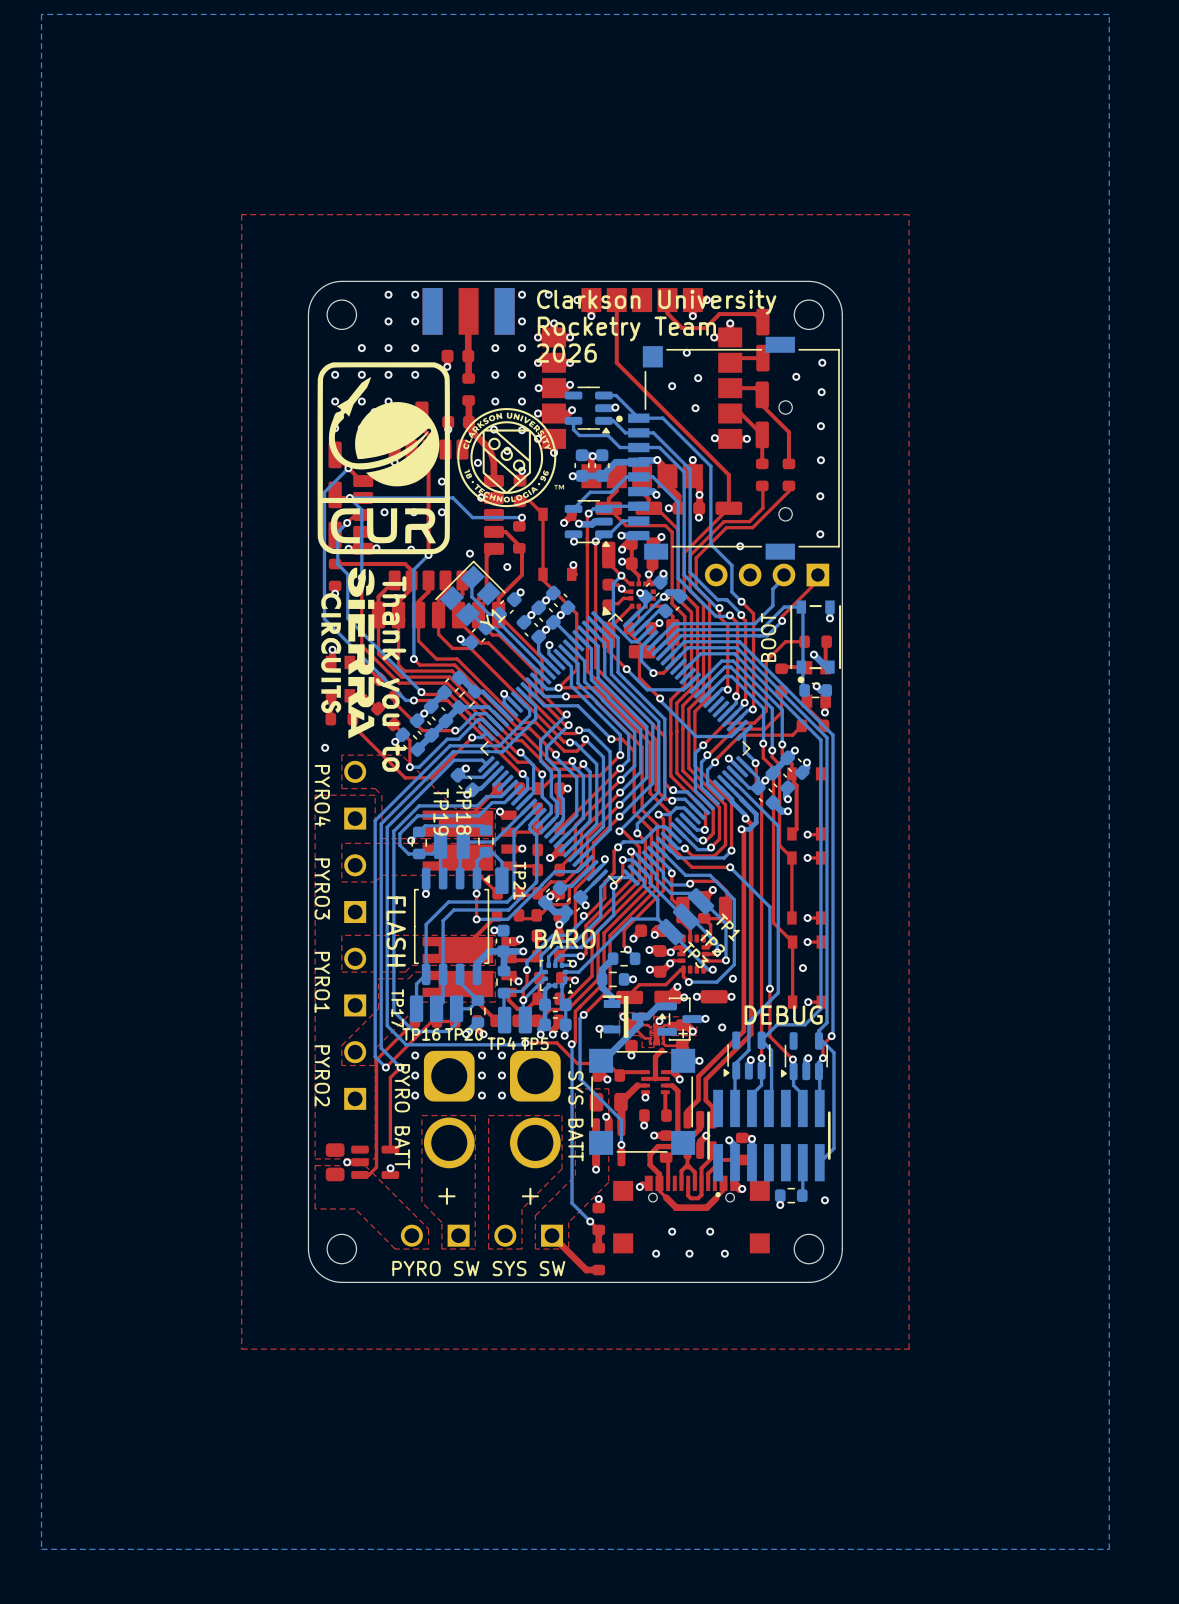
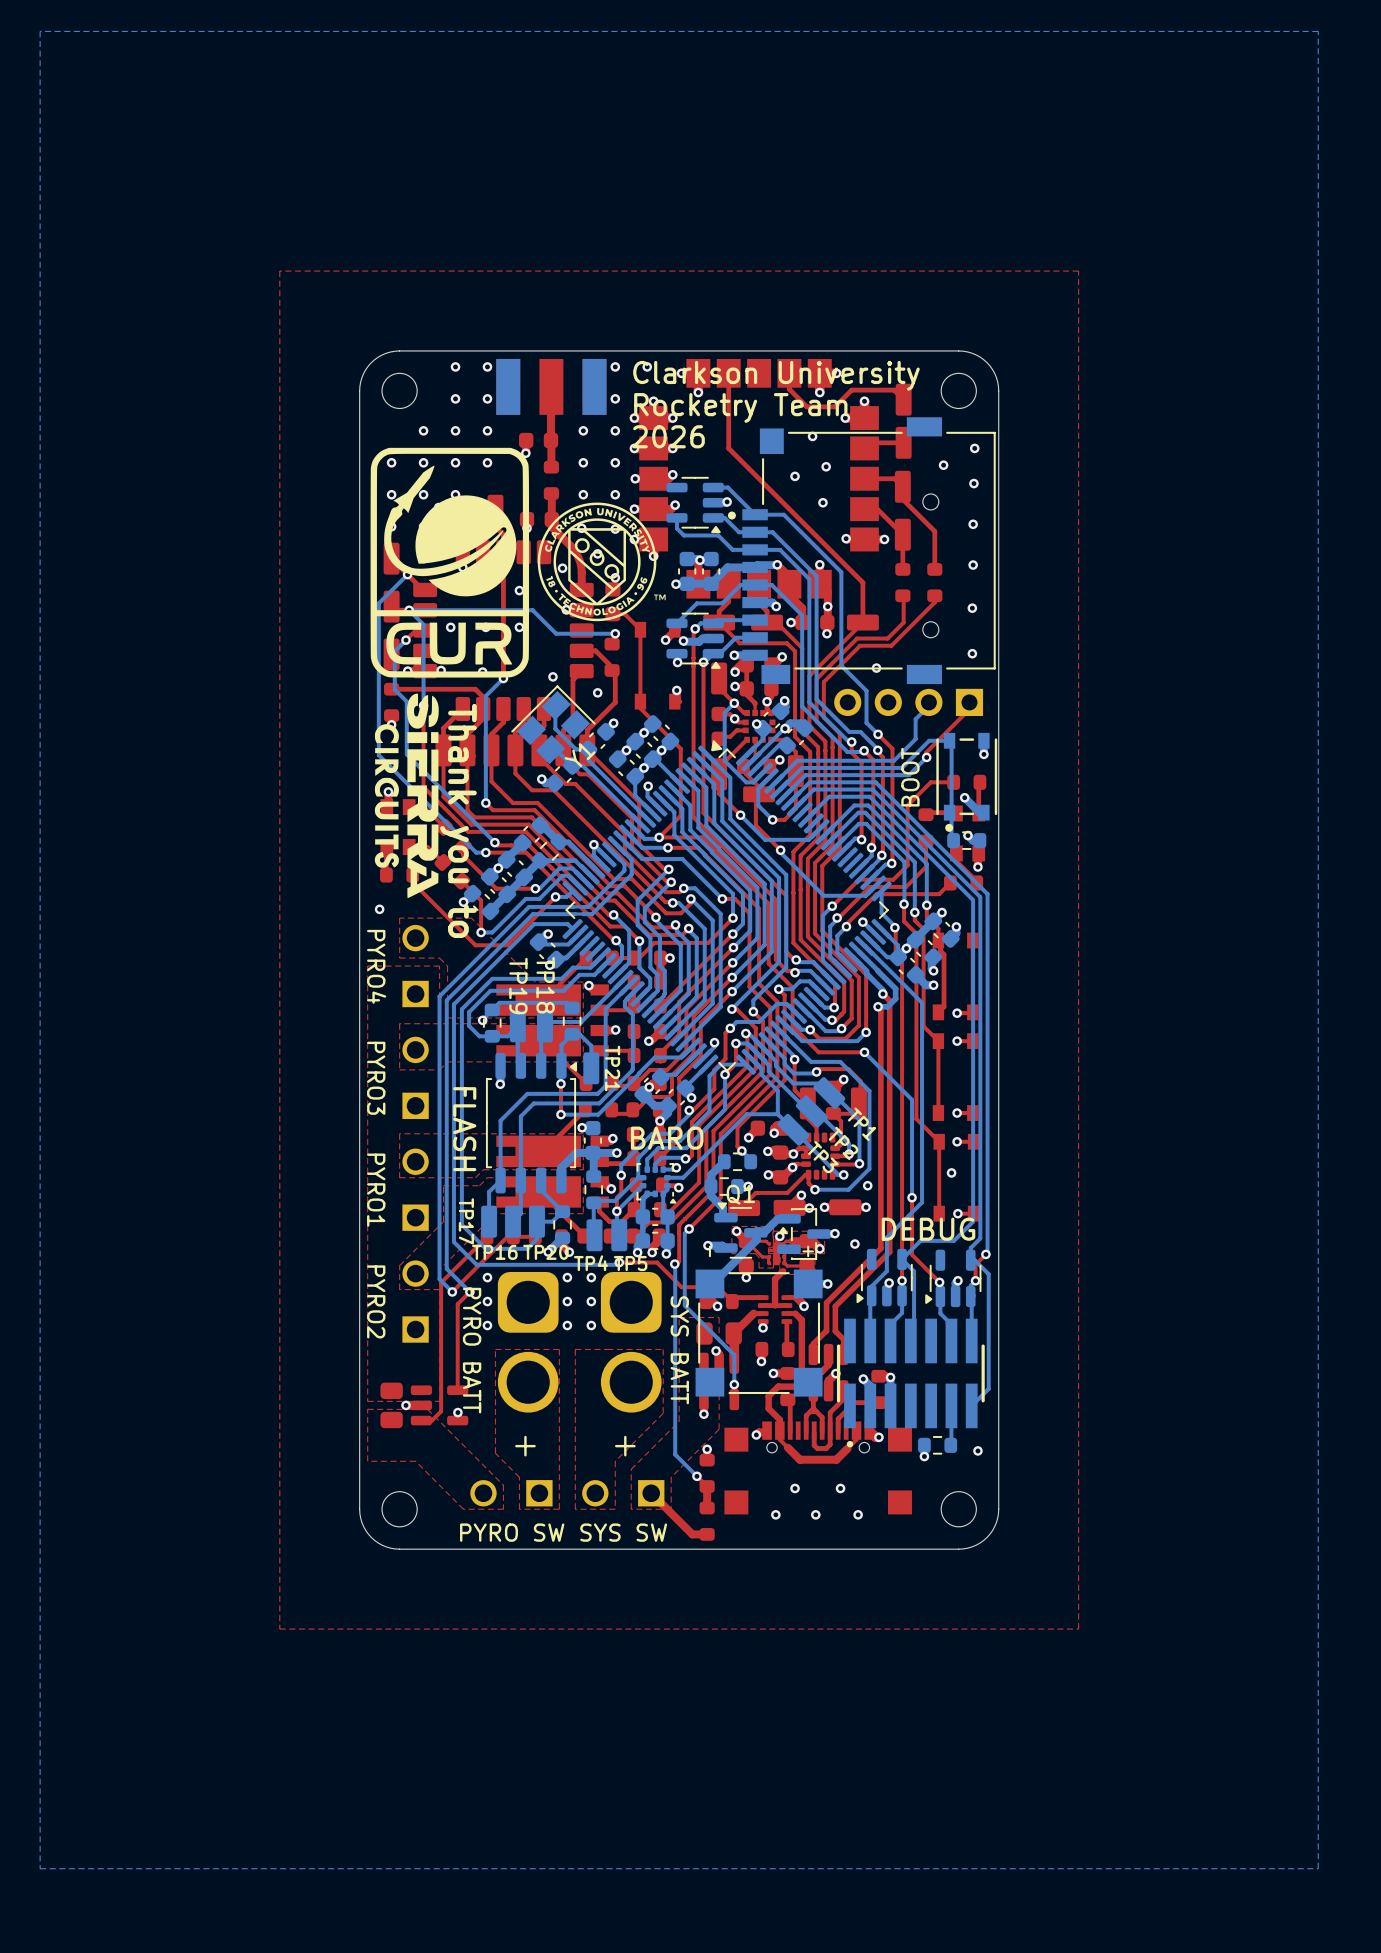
part: (625, 1016) -> none
Q1: none -> (740, 1230)

